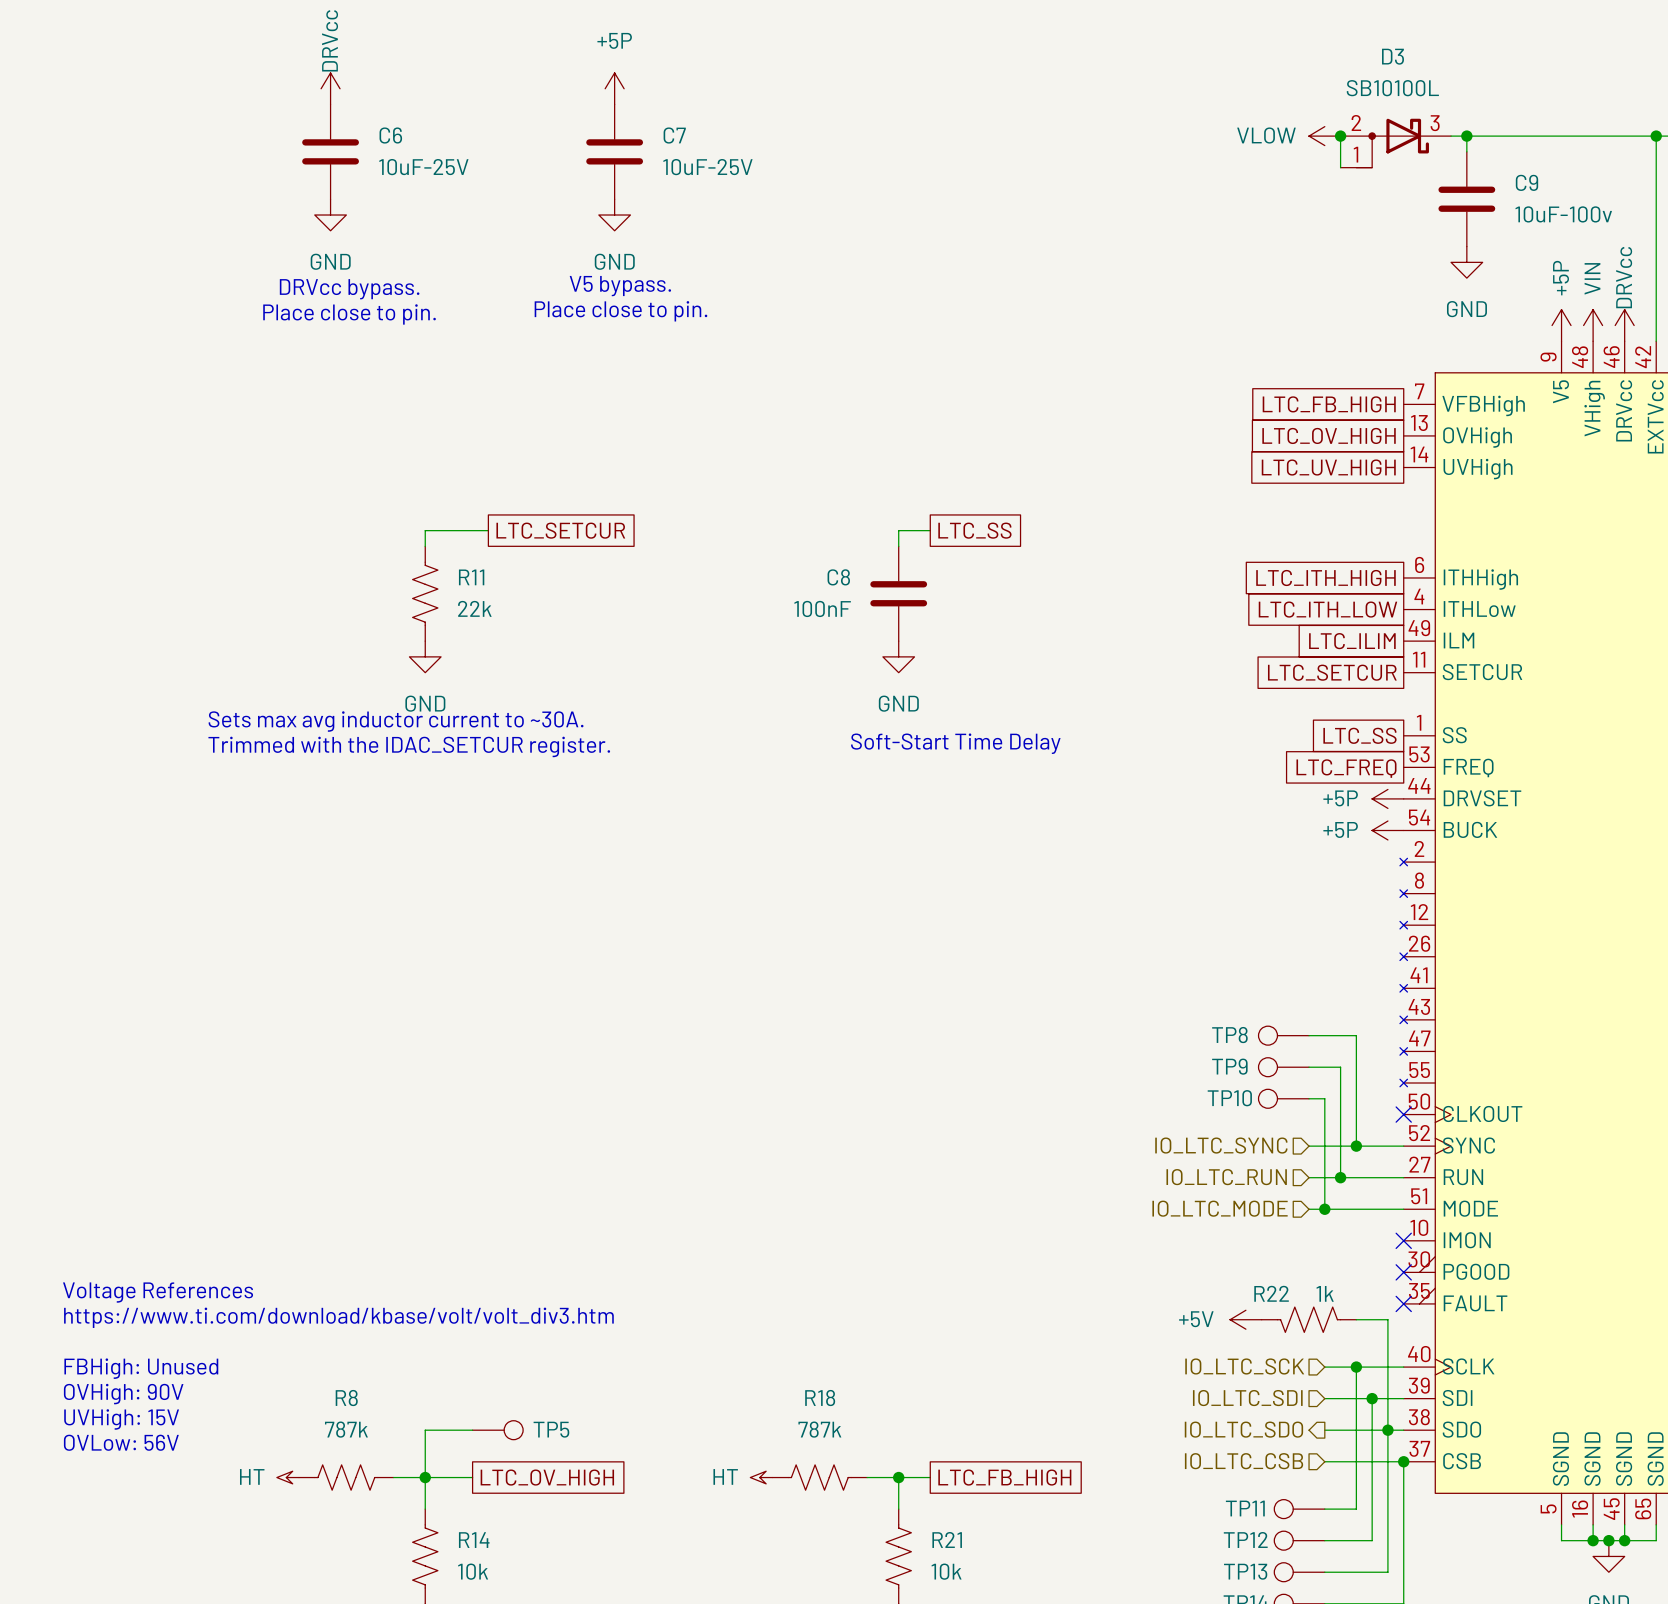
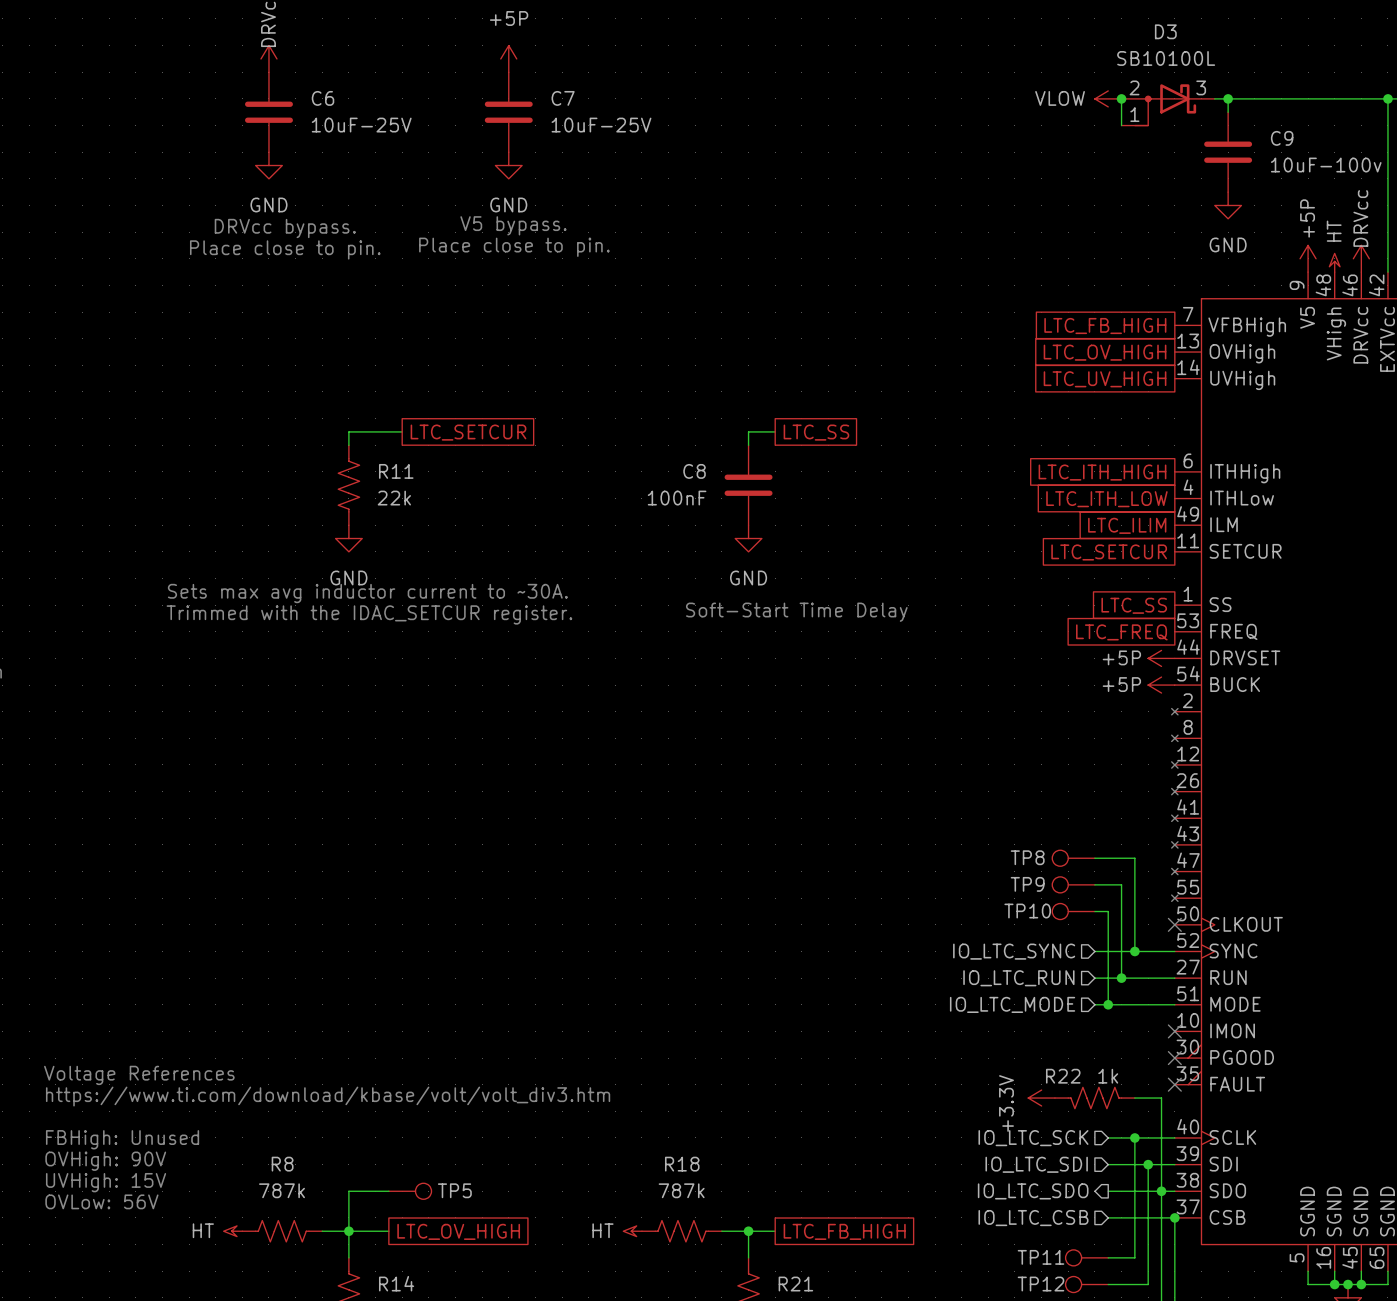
power symbol: VIN (1593, 325) -> HT (1334, 262)
power symbol: +5V (1245, 1319) -> +3.3V (1041, 1098)

